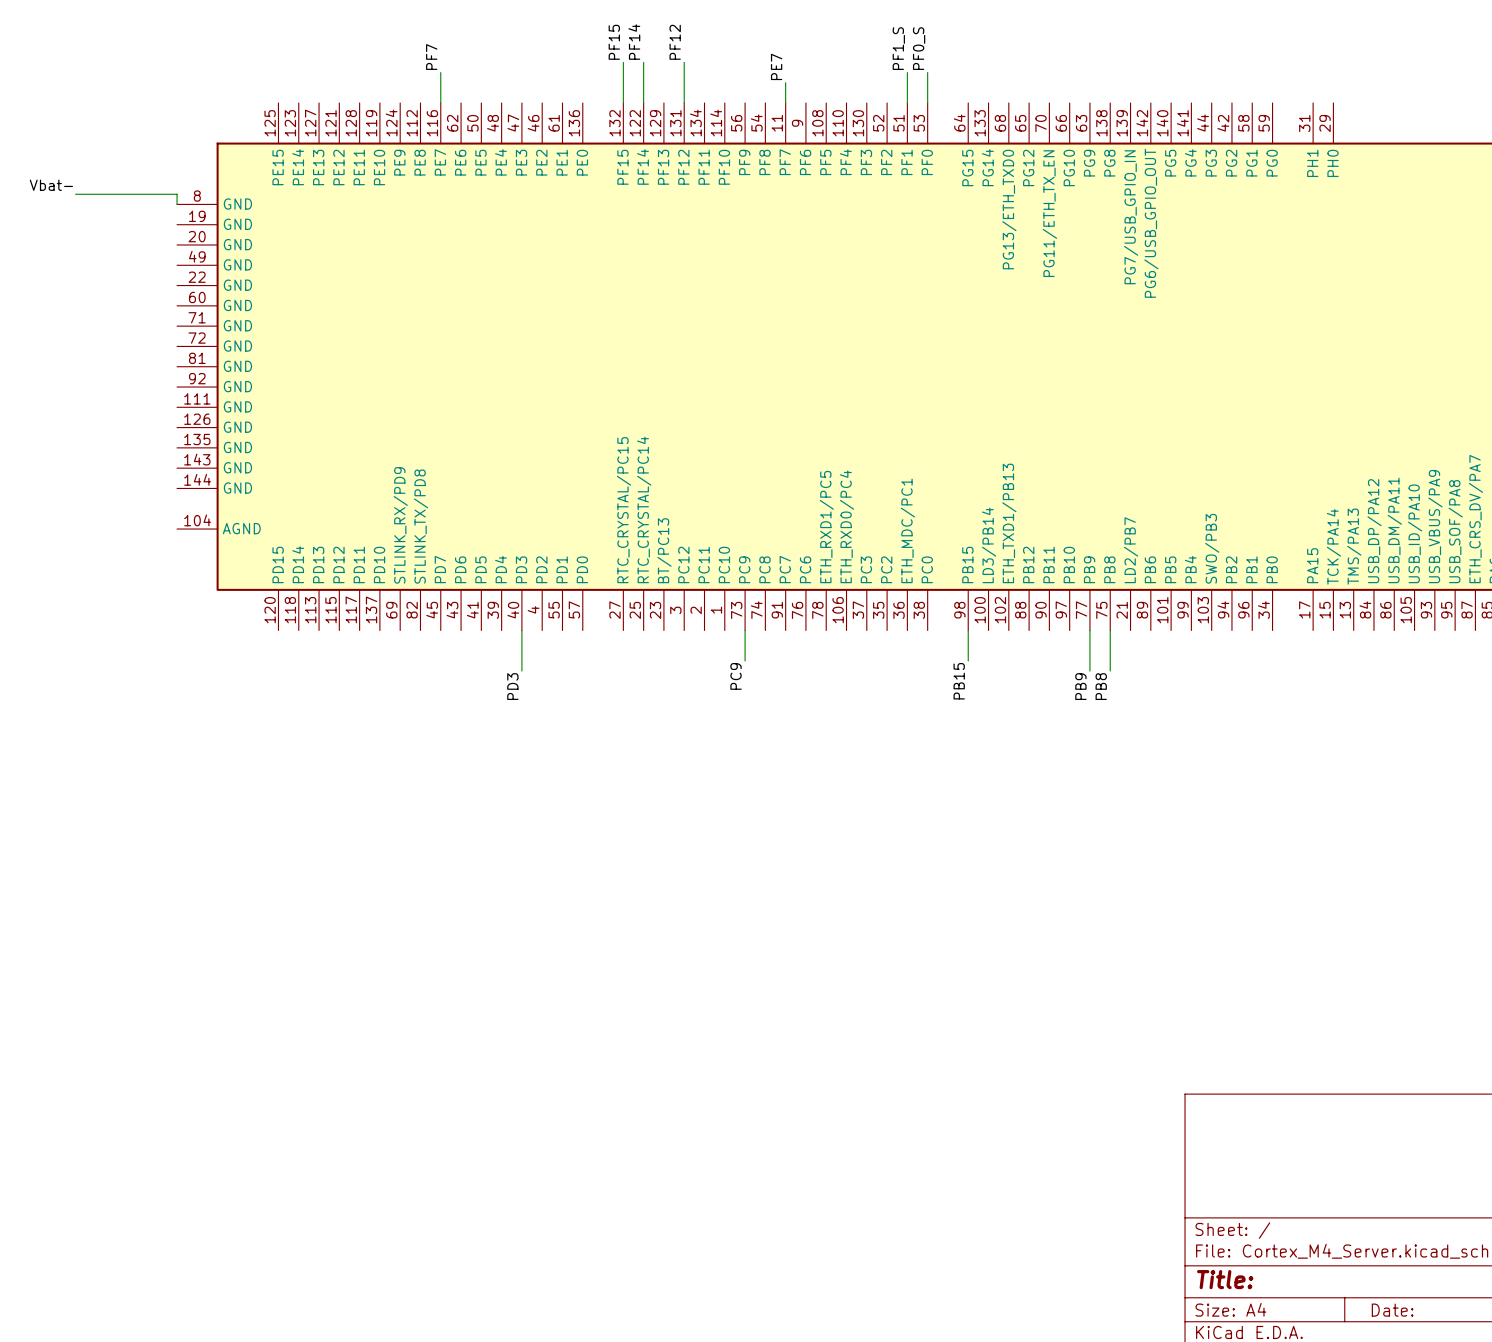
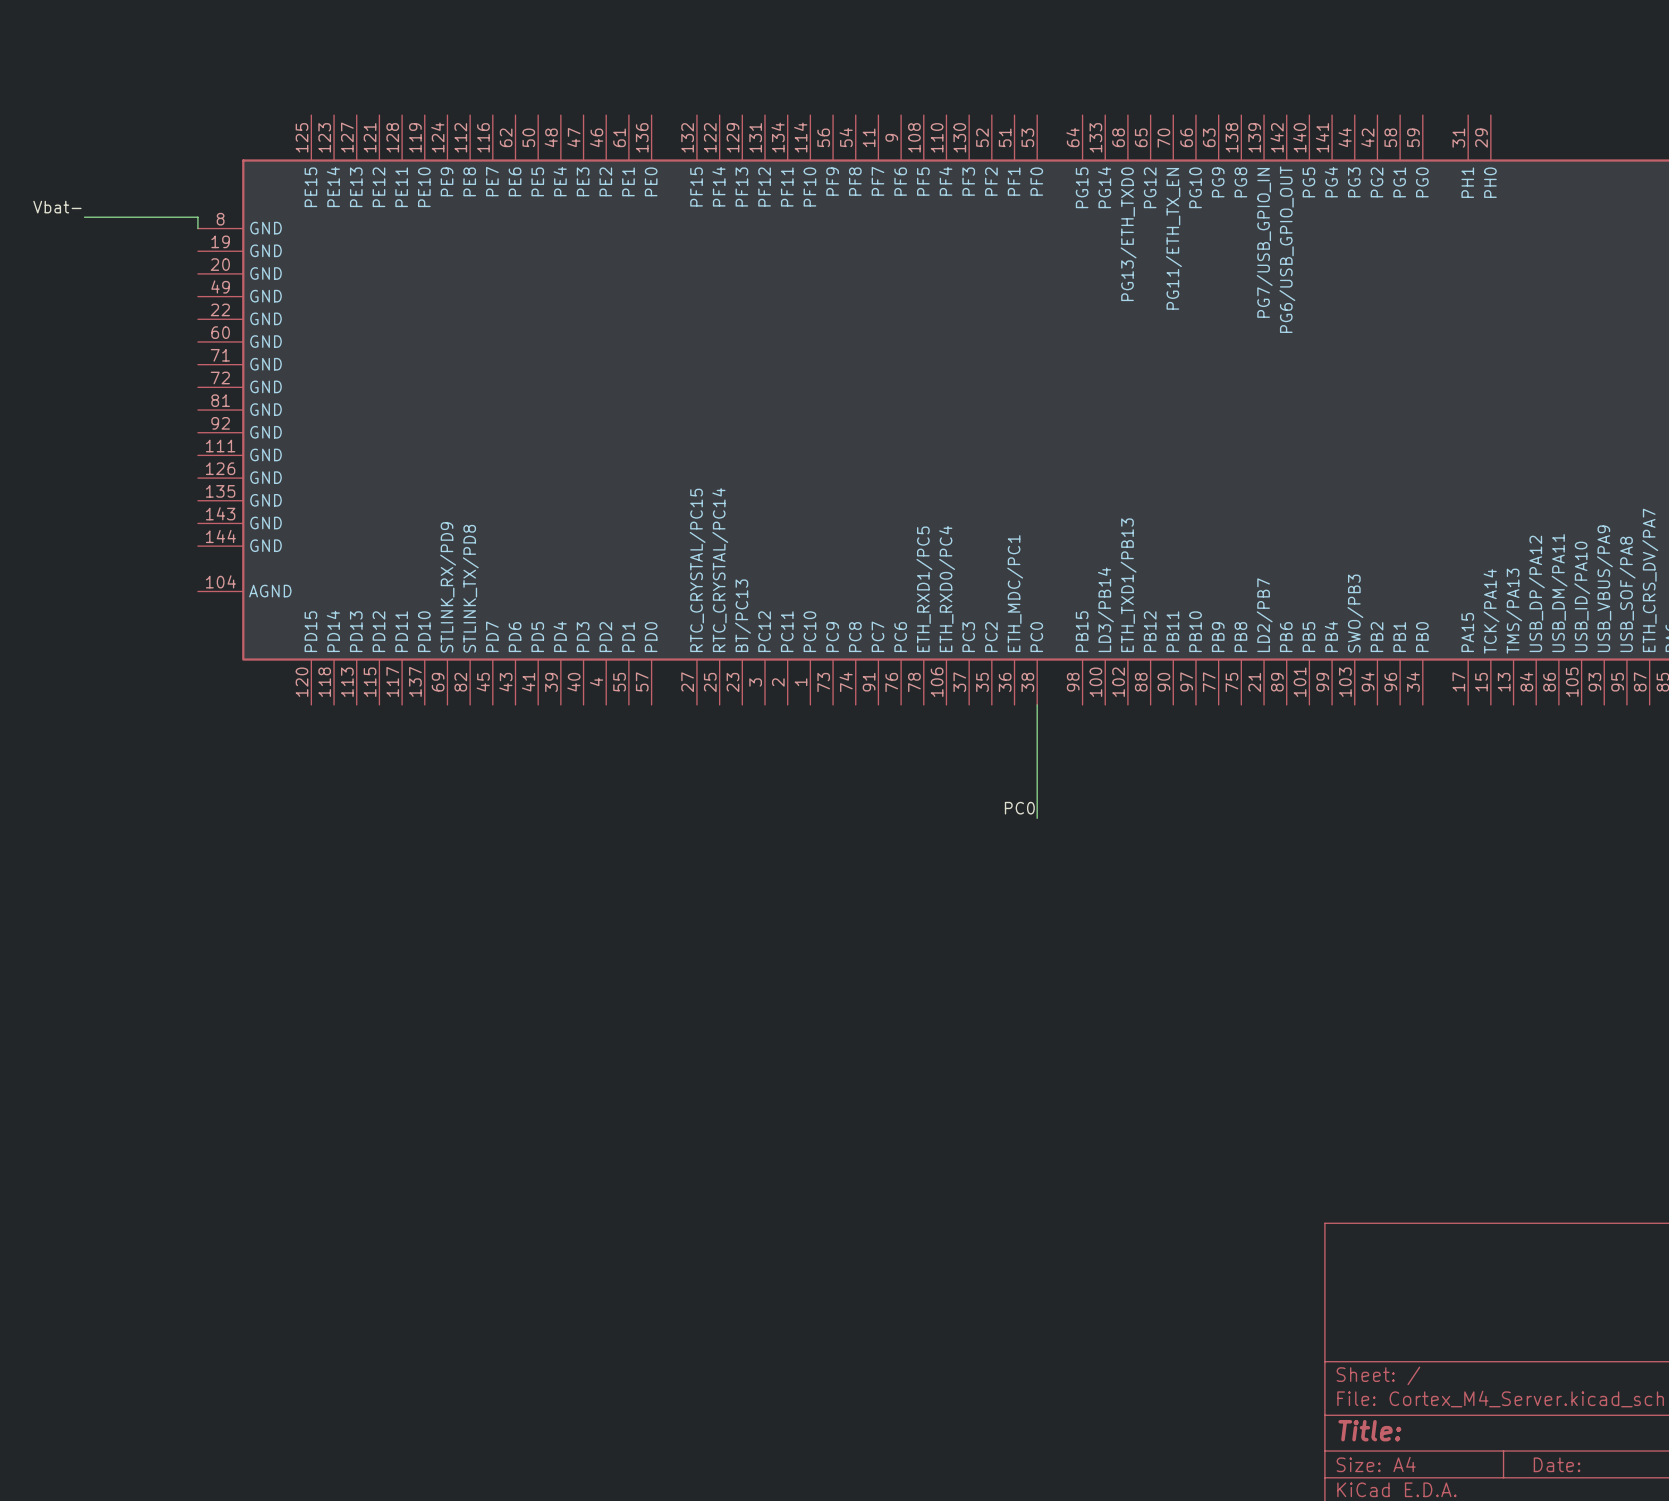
label: PF15 (614, 42) -> none
label: PF14 (634, 42) -> none
label: PF12 (675, 42) -> none
label: PF1_S (898, 48) -> none
label: PF0_S (919, 48) -> none
label: PF7 (431, 57) -> none
wire: (623, 62) (623, 102) -> none
wire: (643, 62) (643, 102) -> none
wire: (684, 62) (684, 102) -> none
label: PE7 (776, 66) -> none
wire: (440, 72) (440, 102) -> none
wire: (907, 72) (907, 102) -> none
wire: (927, 72) (927, 102) -> none
wire: (785, 82) (785, 102) -> none
wire: (521, 630) (521, 671) -> none
wire: (745, 630) (745, 660) -> none
wire: none -> (1037, 704) (1037, 818)
wire: (968, 630) (968, 660) -> none
wire: (1089, 630) (1089, 671) -> none
wire: (1110, 630) (1110, 671) -> none
label: PC9 (736, 676) -> none
label: PB15 (959, 681) -> none
label: PD3 (512, 686) -> none
label: PB9 (1080, 686) -> none
label: PB8 (1101, 686) -> none
label: none -> PC0 (1019, 808)

